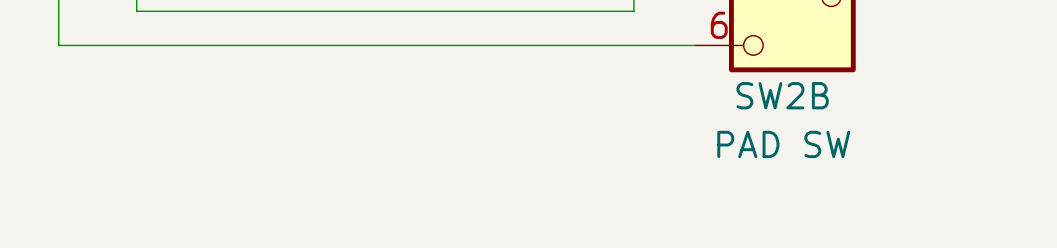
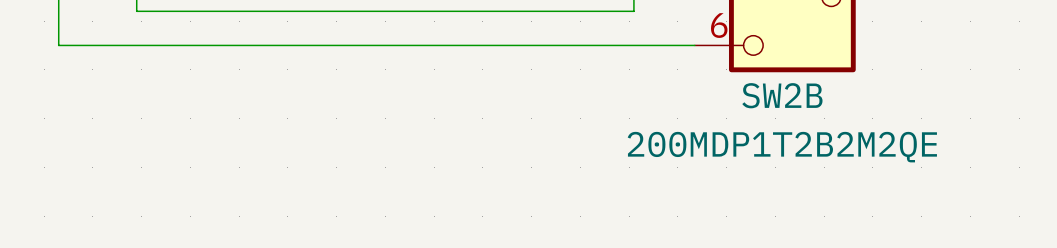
SW2B value: PAD SW (783, 144) -> 200MDP1T2B2M2QE (782, 147)

